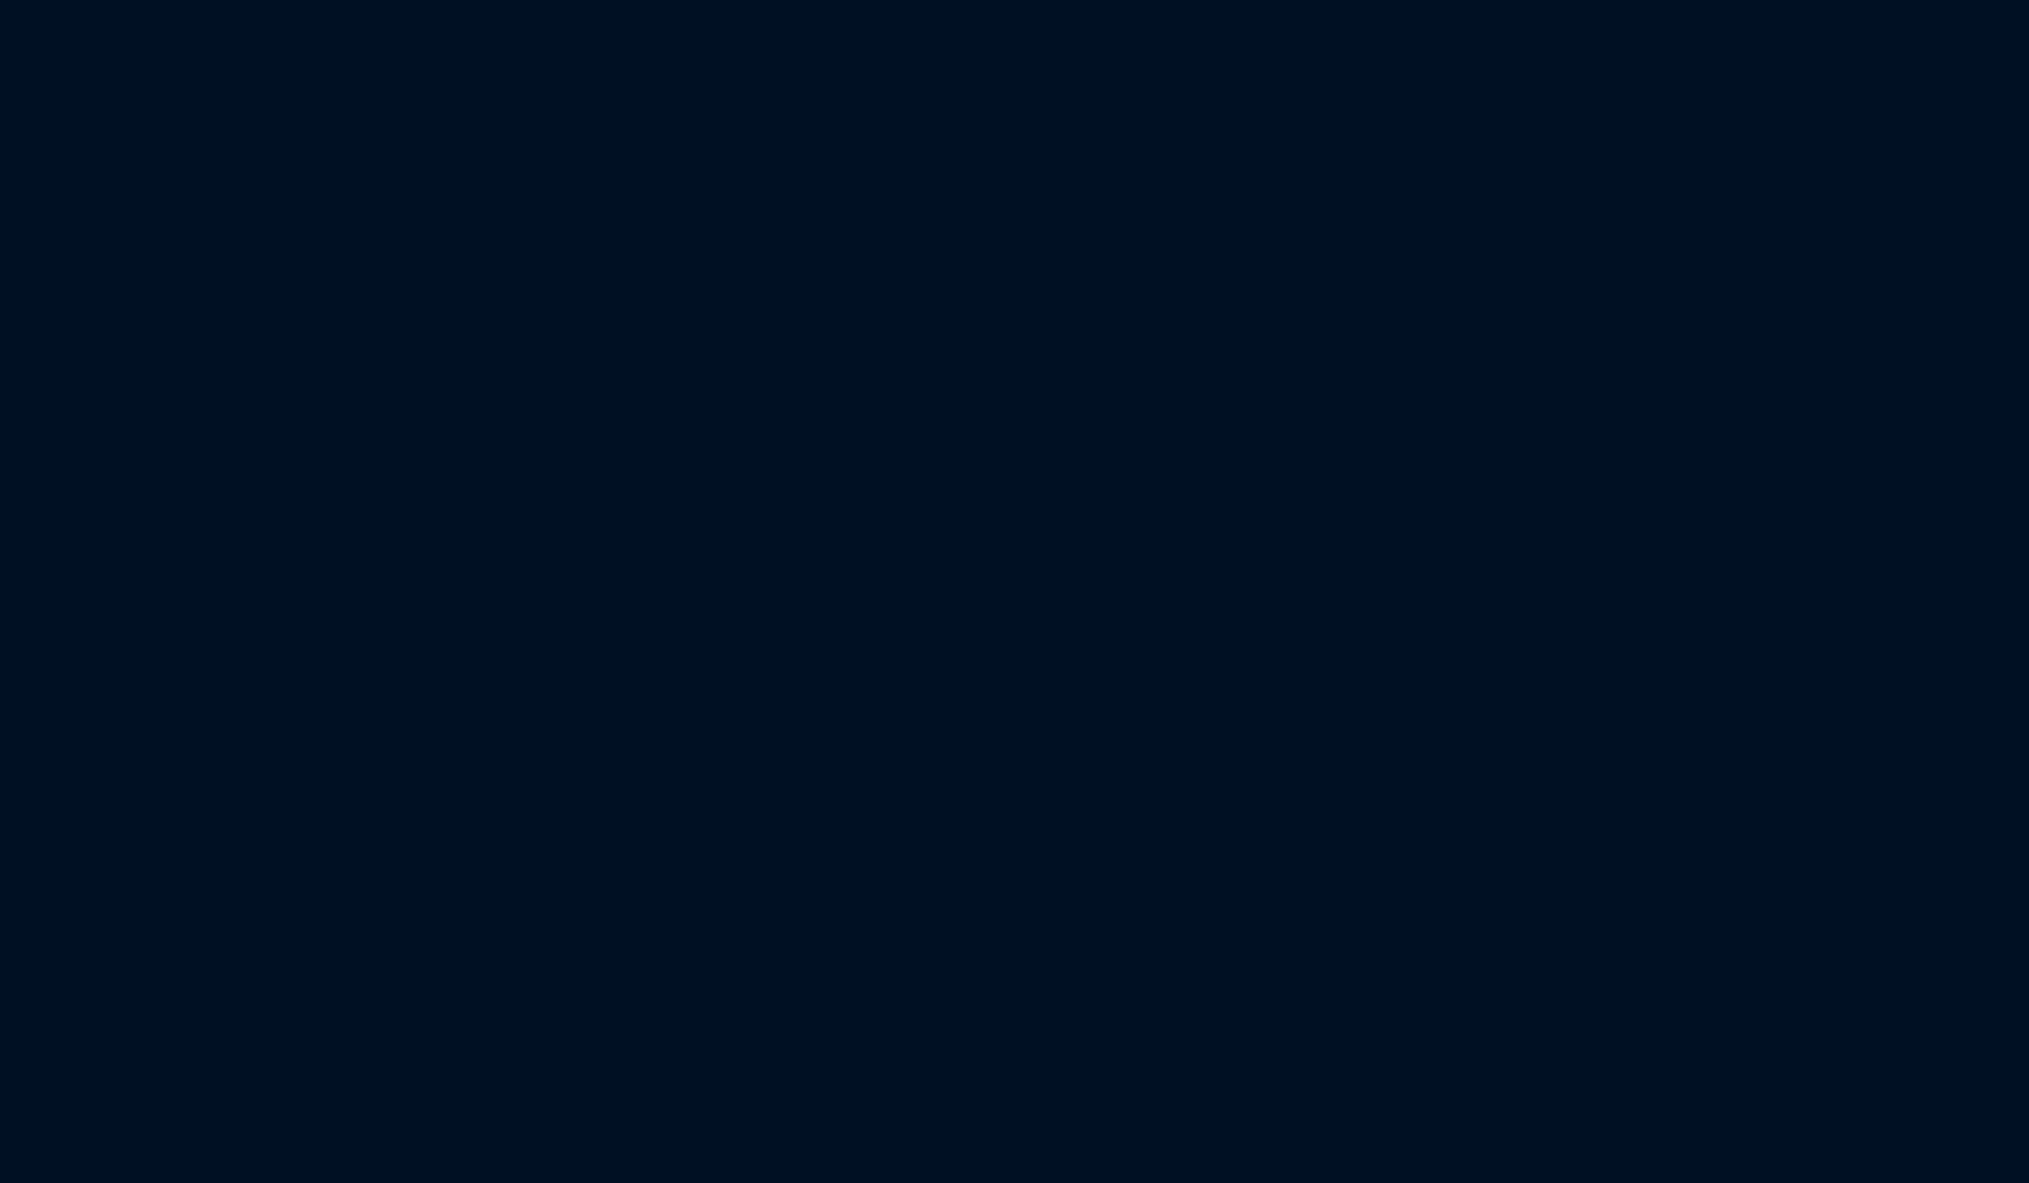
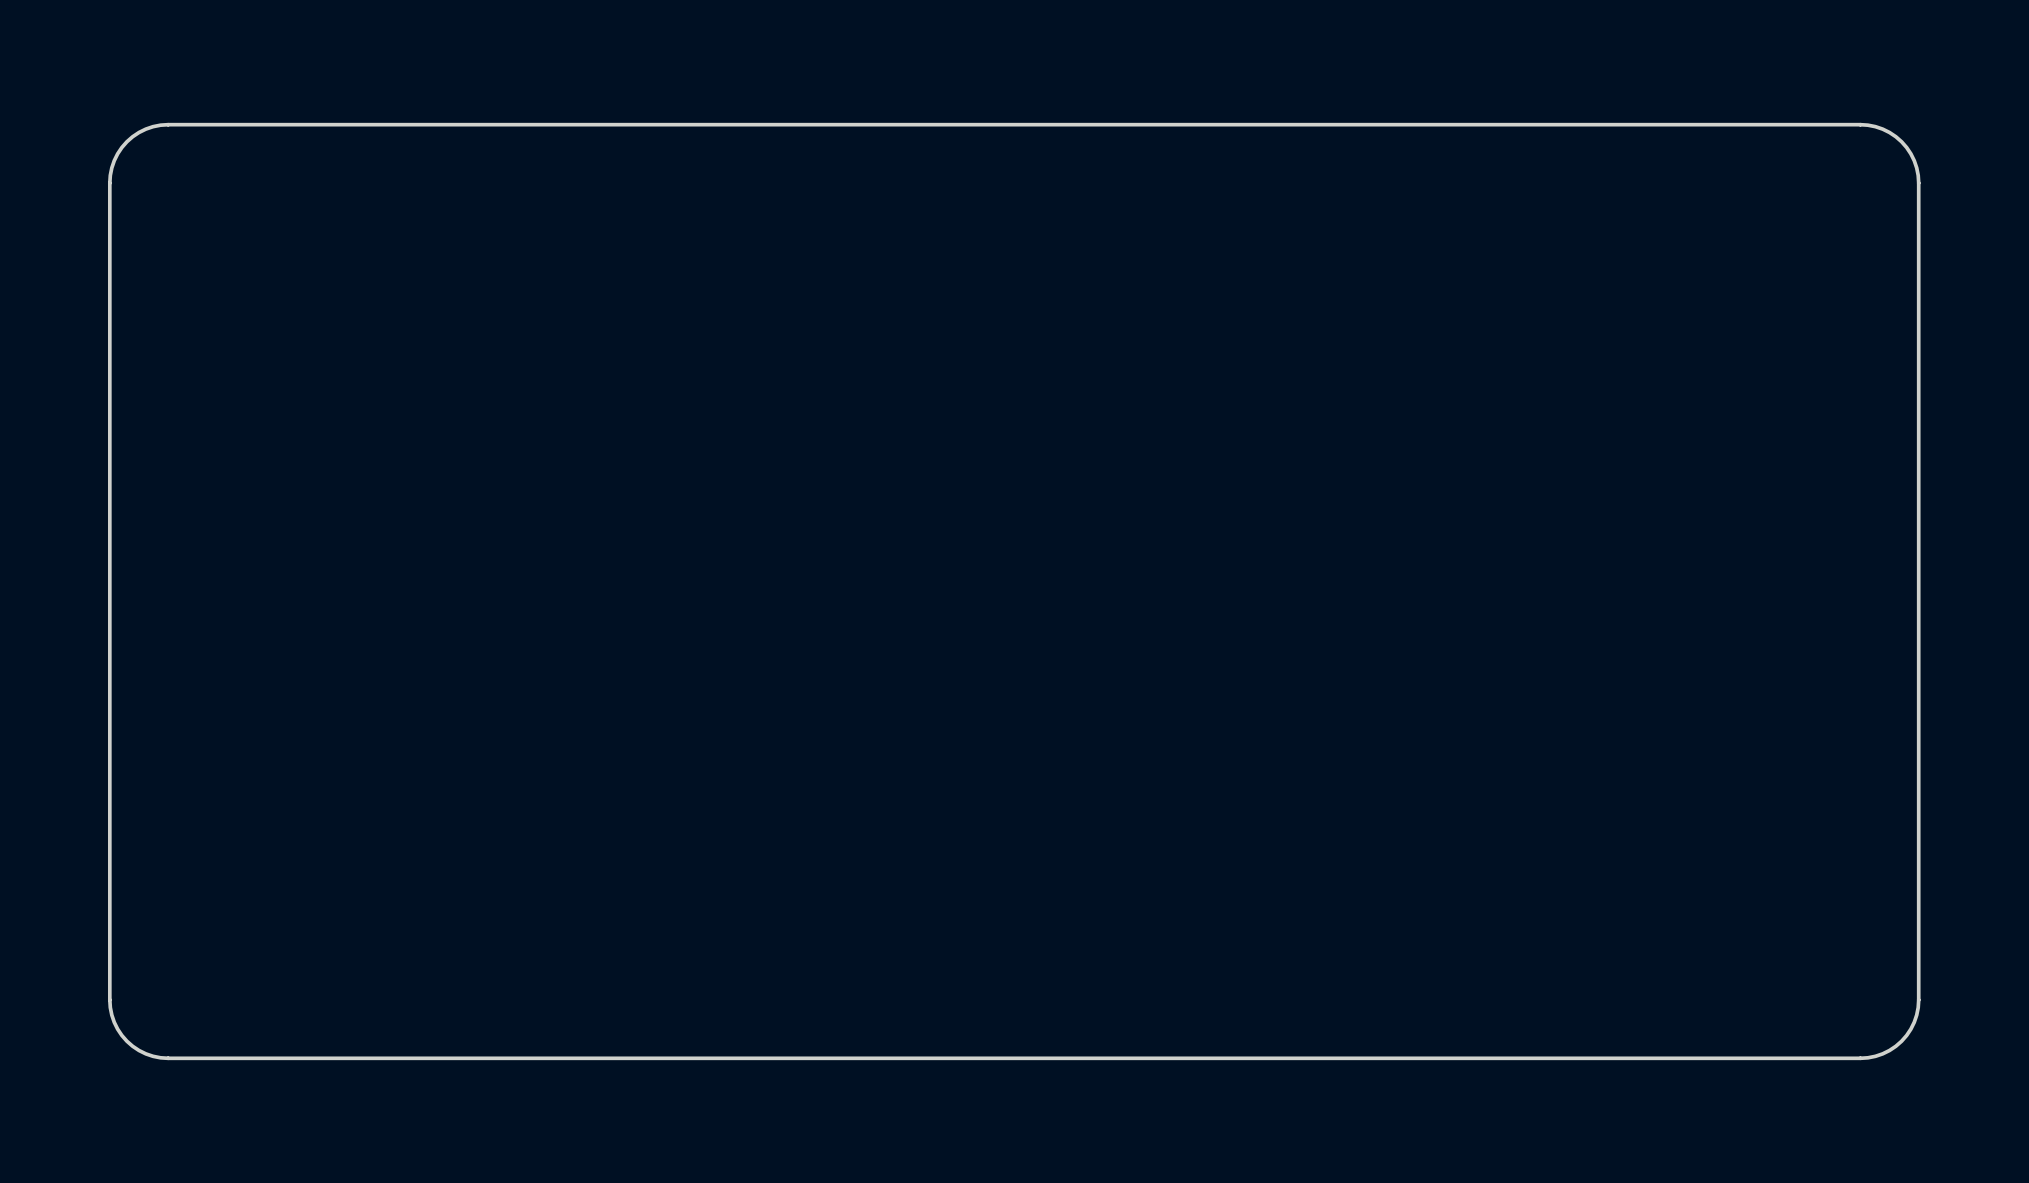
board edge: none -> (168, 124) (1860, 124) (1875, 126) (1889, 132) (1901, 141) (1910, 153) (1916, 167) (1918, 183) (1918, 999) (1916, 1015) (1910, 1029) (1901, 1041) (1889, 1050) (1875, 1056) (1860, 1058) (168, 1058) (153, 1056) (139, 1050) (126, 1041) (117, 1029) (111, 1015) (109, 999) (109, 183) (114, 160) (126, 141) (145, 129) (168, 124)

